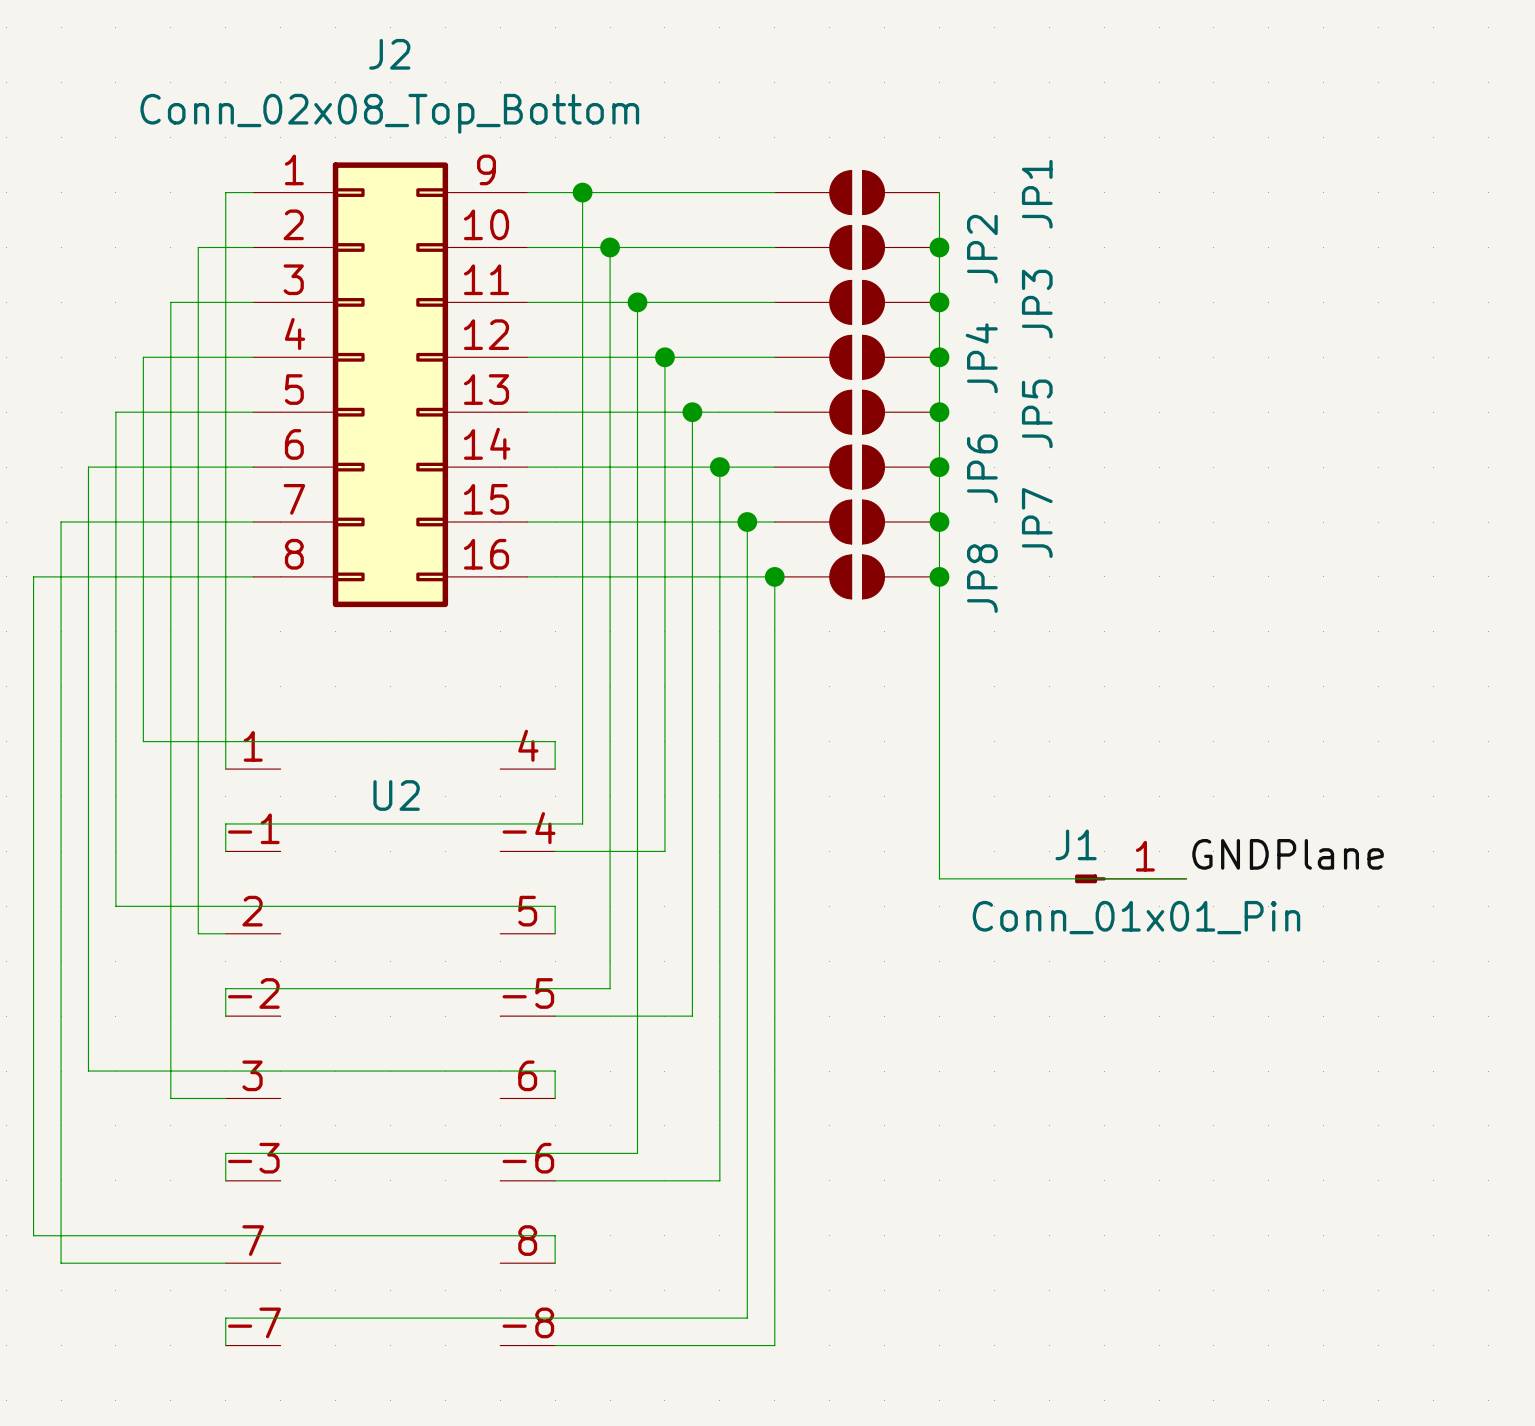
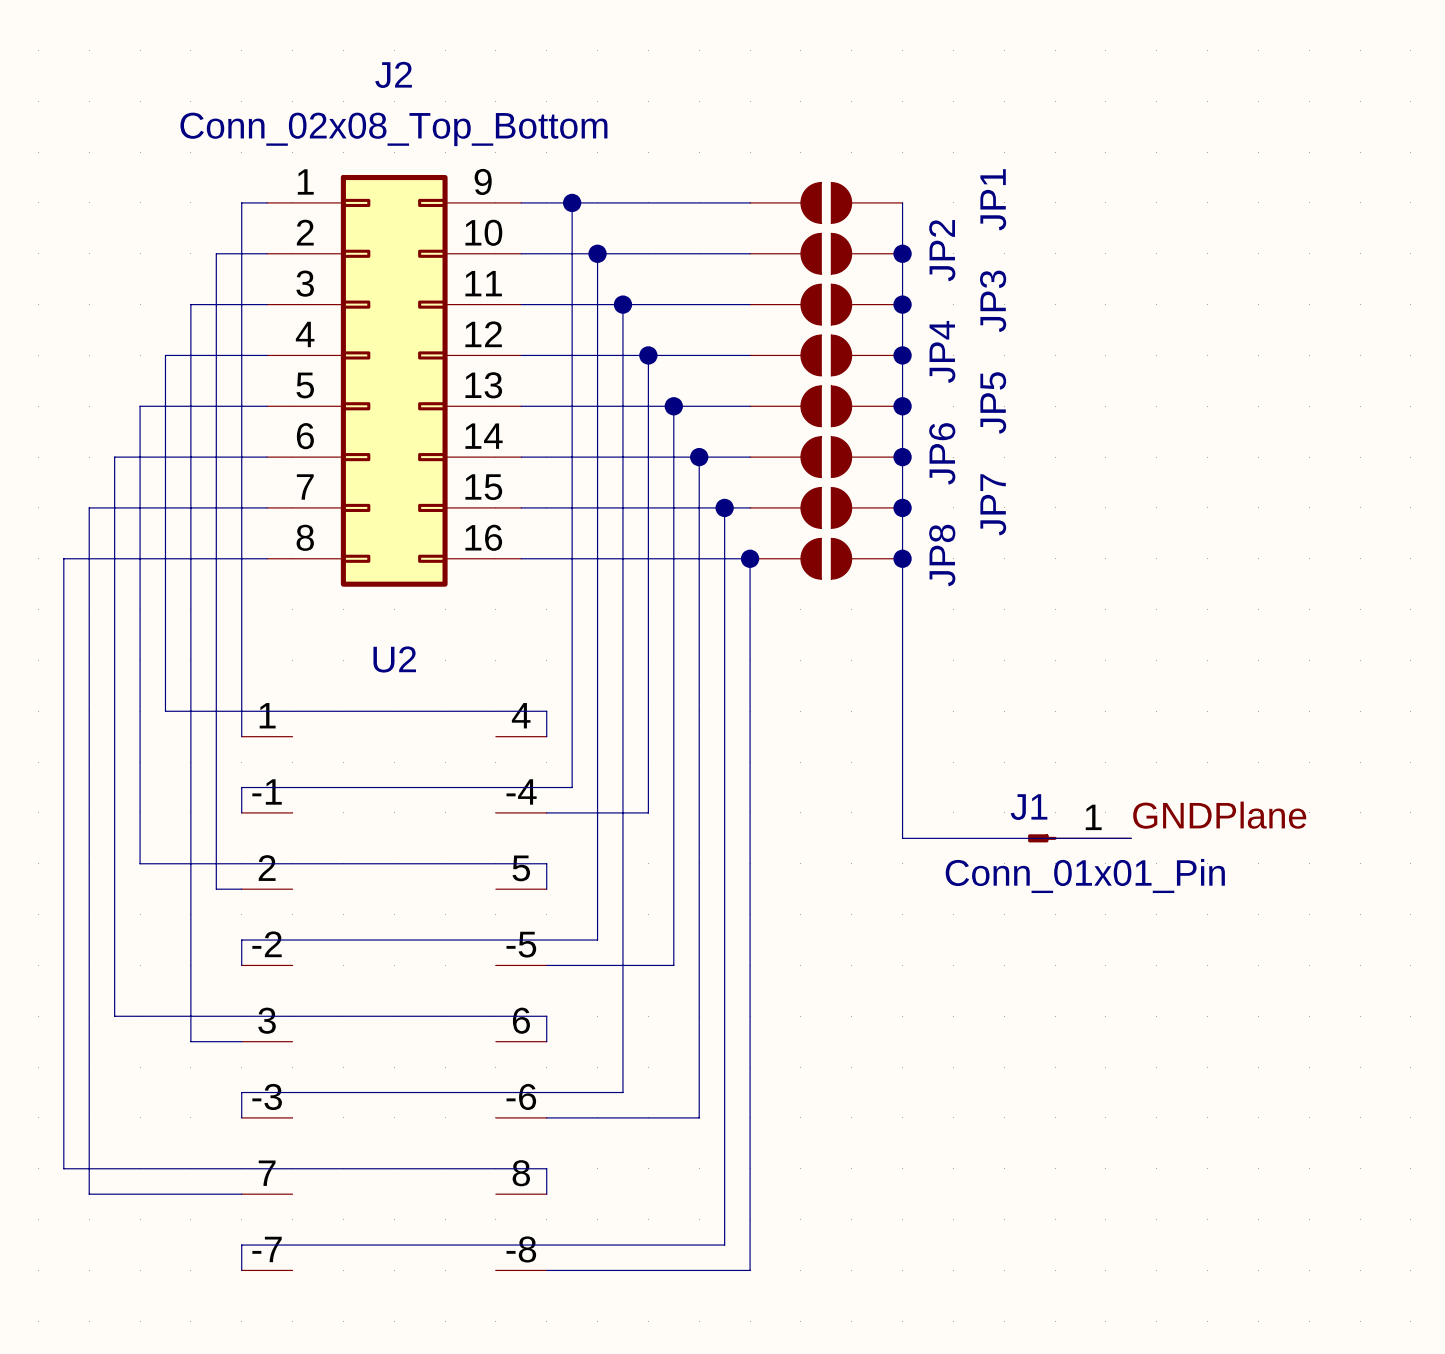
U2 name position: U2 (396, 795) -> U2 (394, 659)

